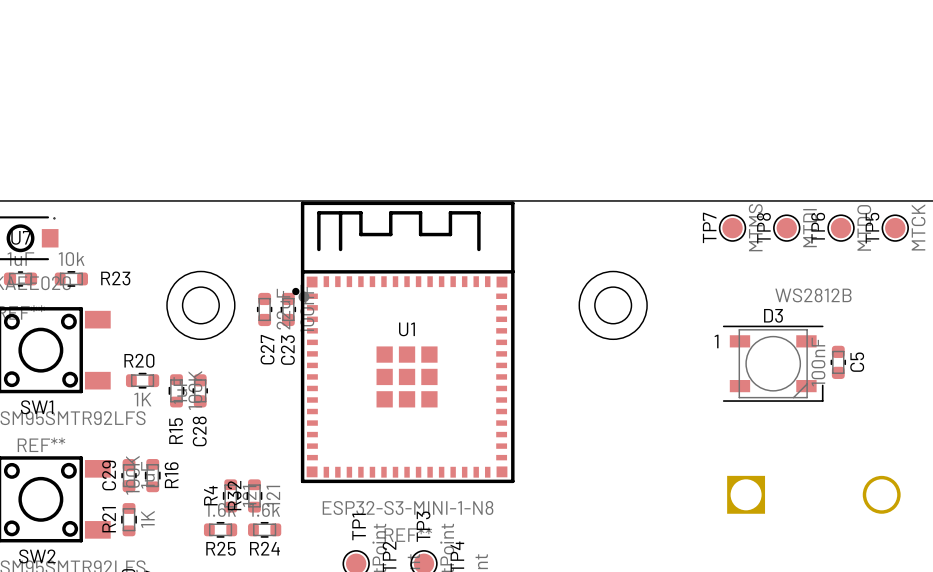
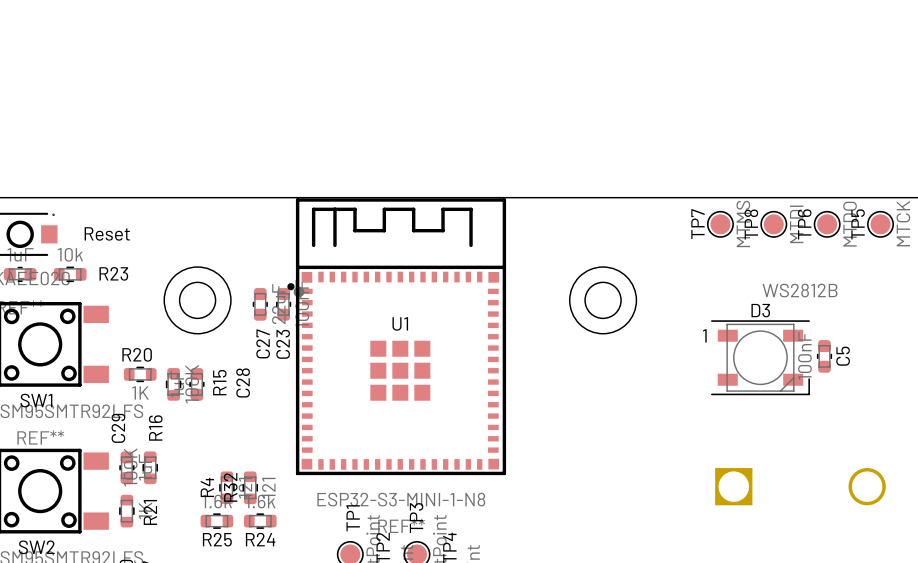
U7 name: U7 (21, 237) -> Reset (107, 233)
R15 name position: R15 (176, 431) -> R15 (219, 382)
C28 name position: C28 (199, 431) -> C28 (243, 382)
C29 name position: C29 (109, 475) -> C29 (118, 428)
R16 name position: R16 (171, 475) -> R16 (155, 428)
R21 name position: R21 (109, 519) -> R21 (150, 512)

